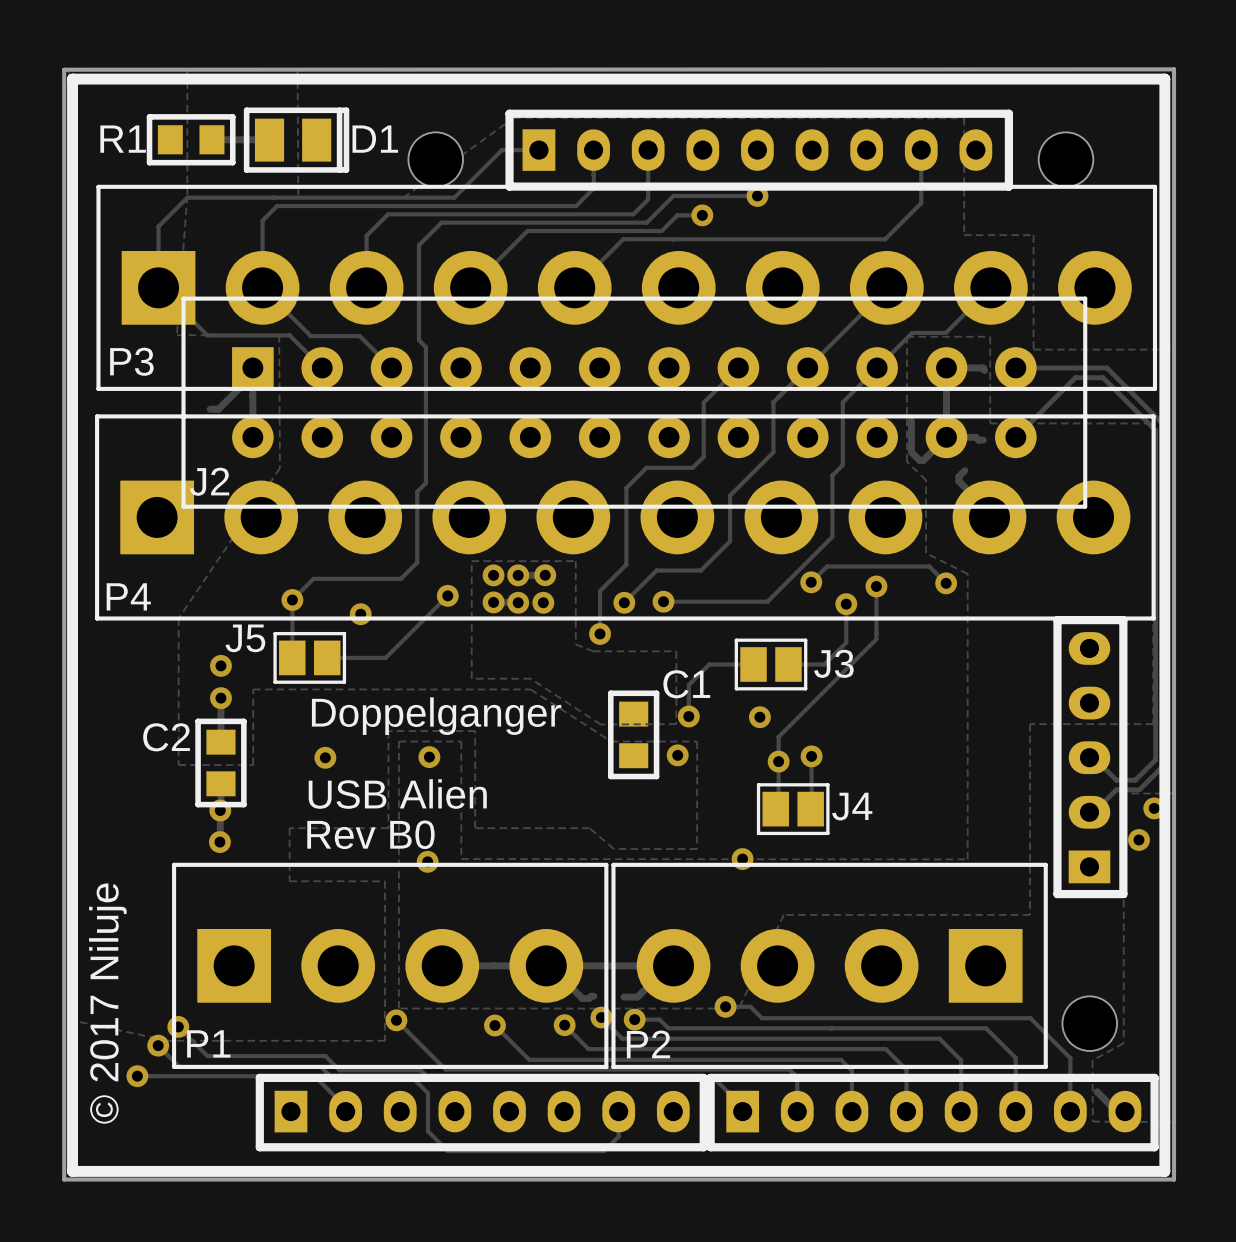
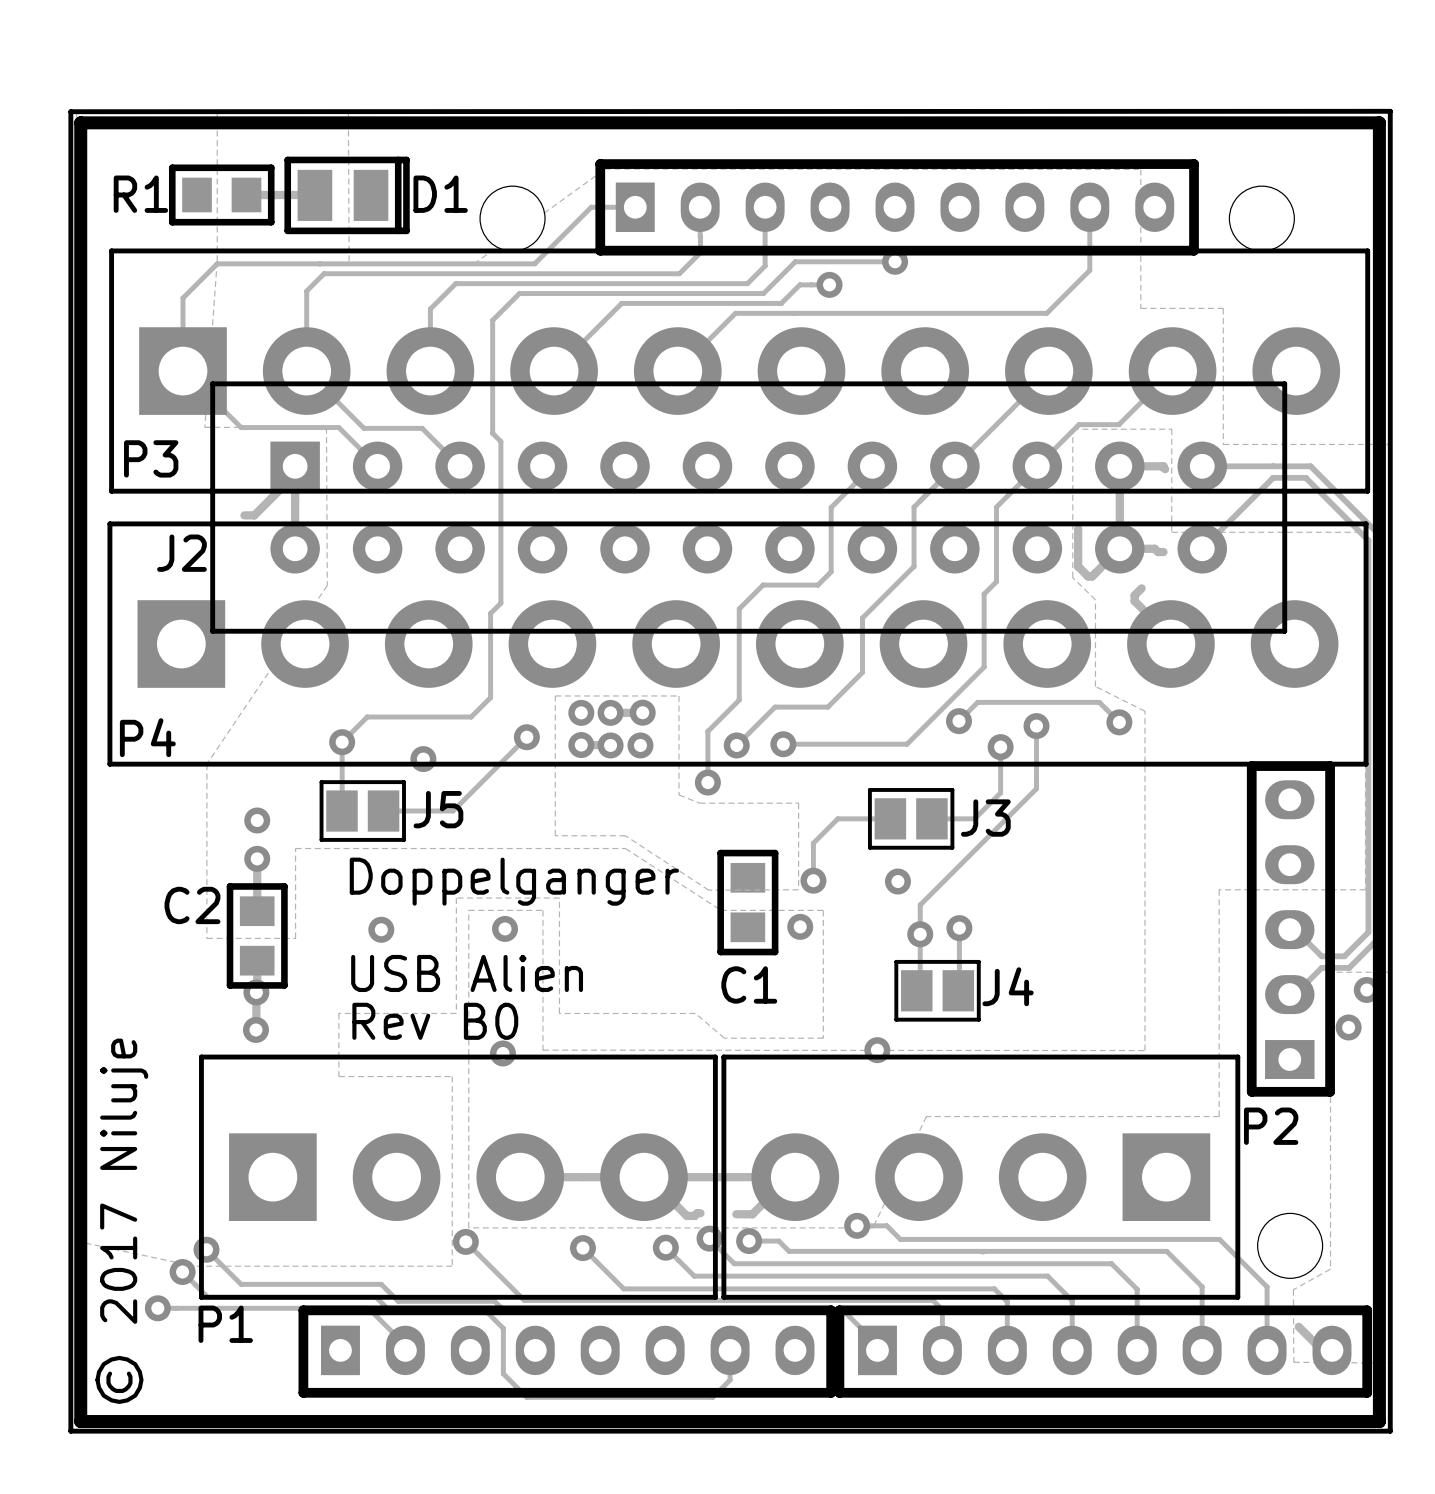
J2 name position: J2 (209, 481) -> J2 (181, 553)
J5 name position: J5 (245, 638) -> J5 (438, 809)
C1 name position: C1 (686, 684) -> C1 (749, 984)
P1 name position: P1 (208, 1043) -> P1 (225, 1324)
P2 name position: P2 (648, 1044) -> P2 (1271, 1126)

